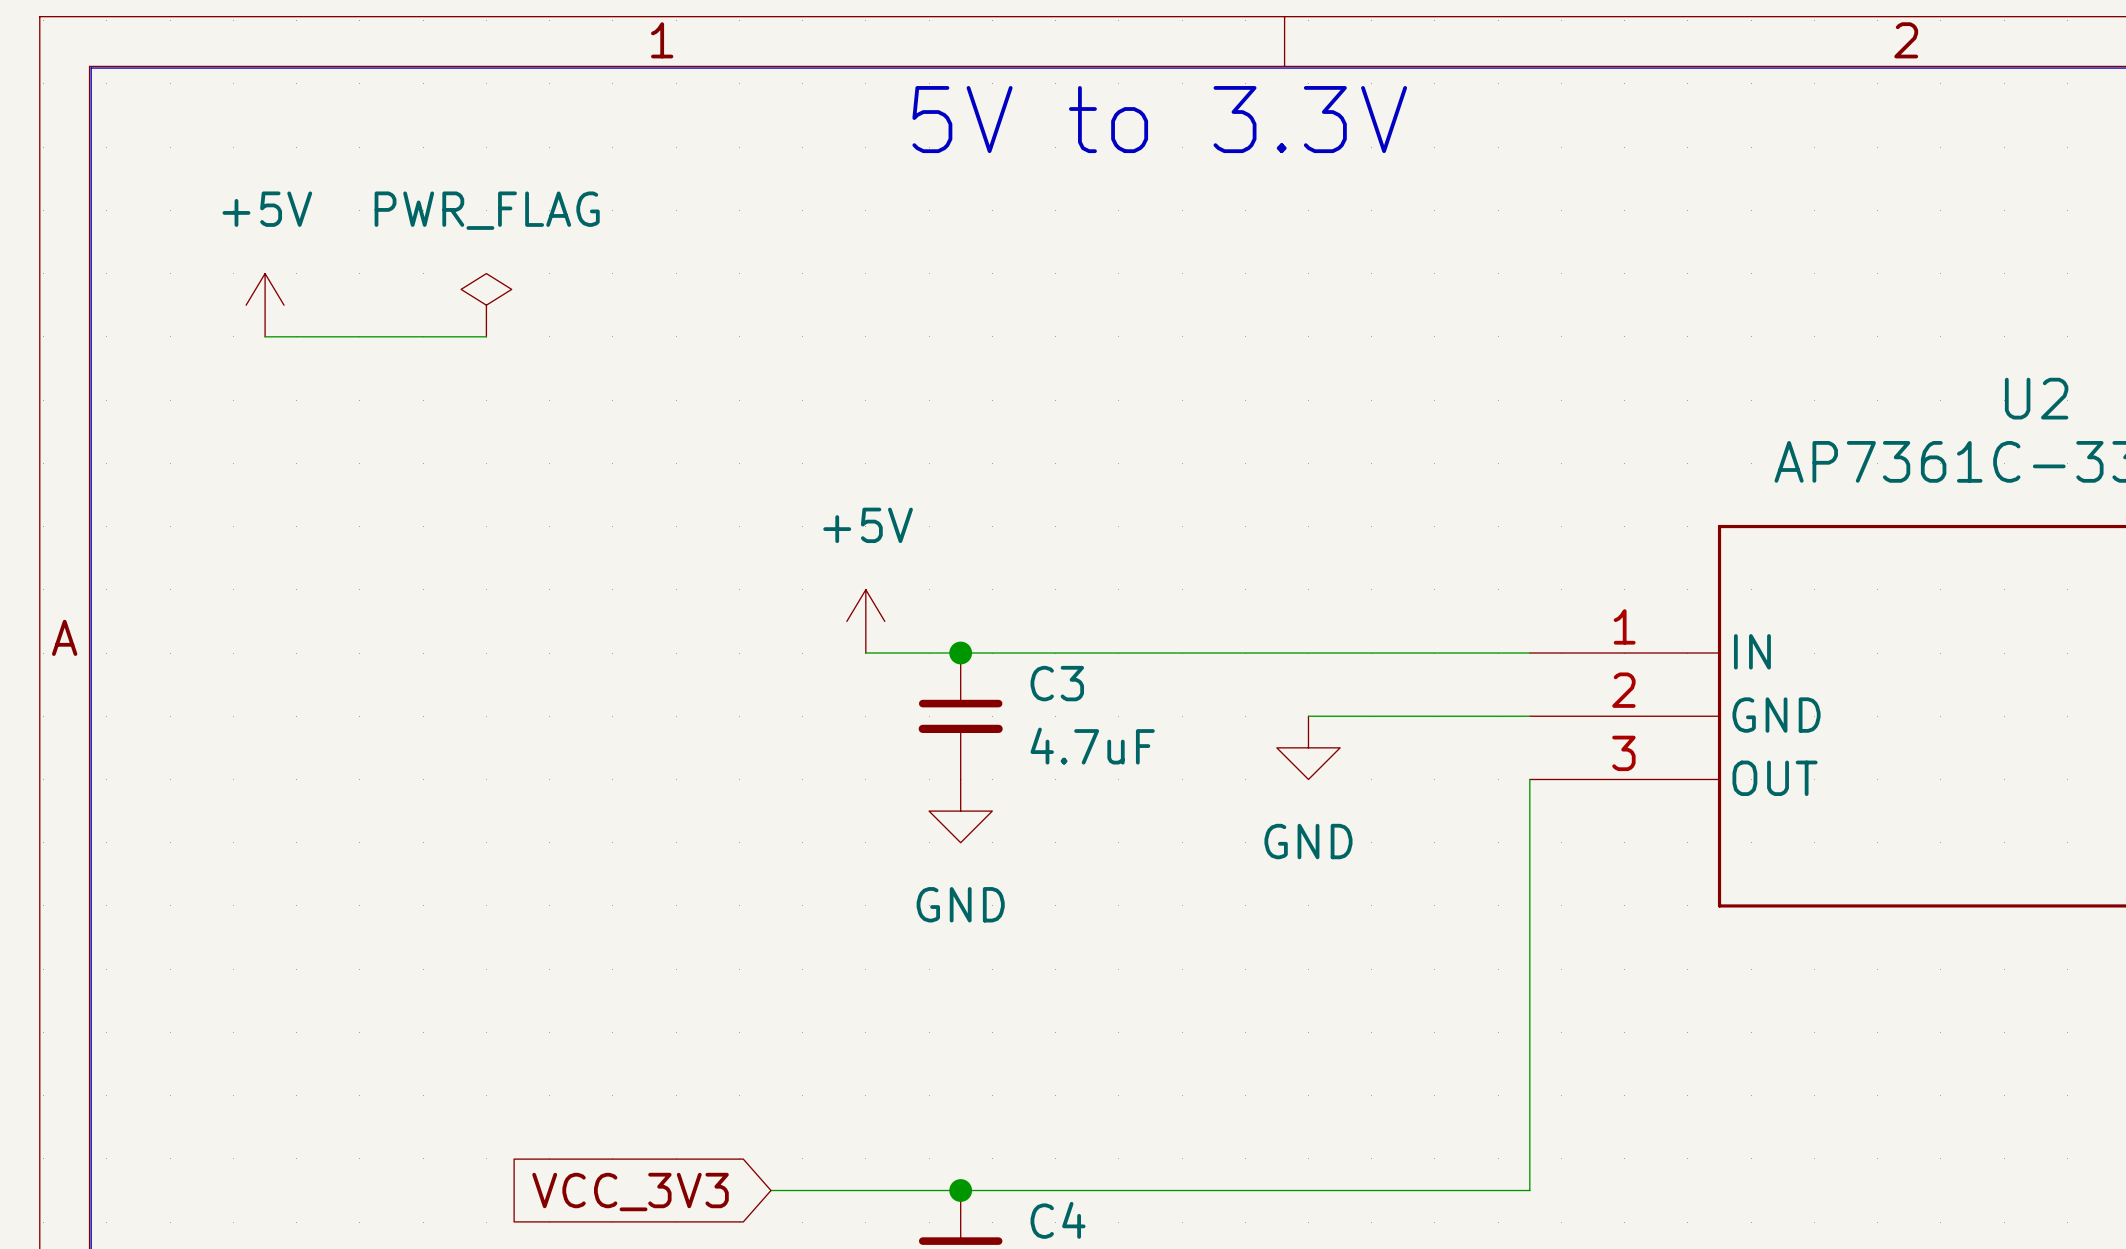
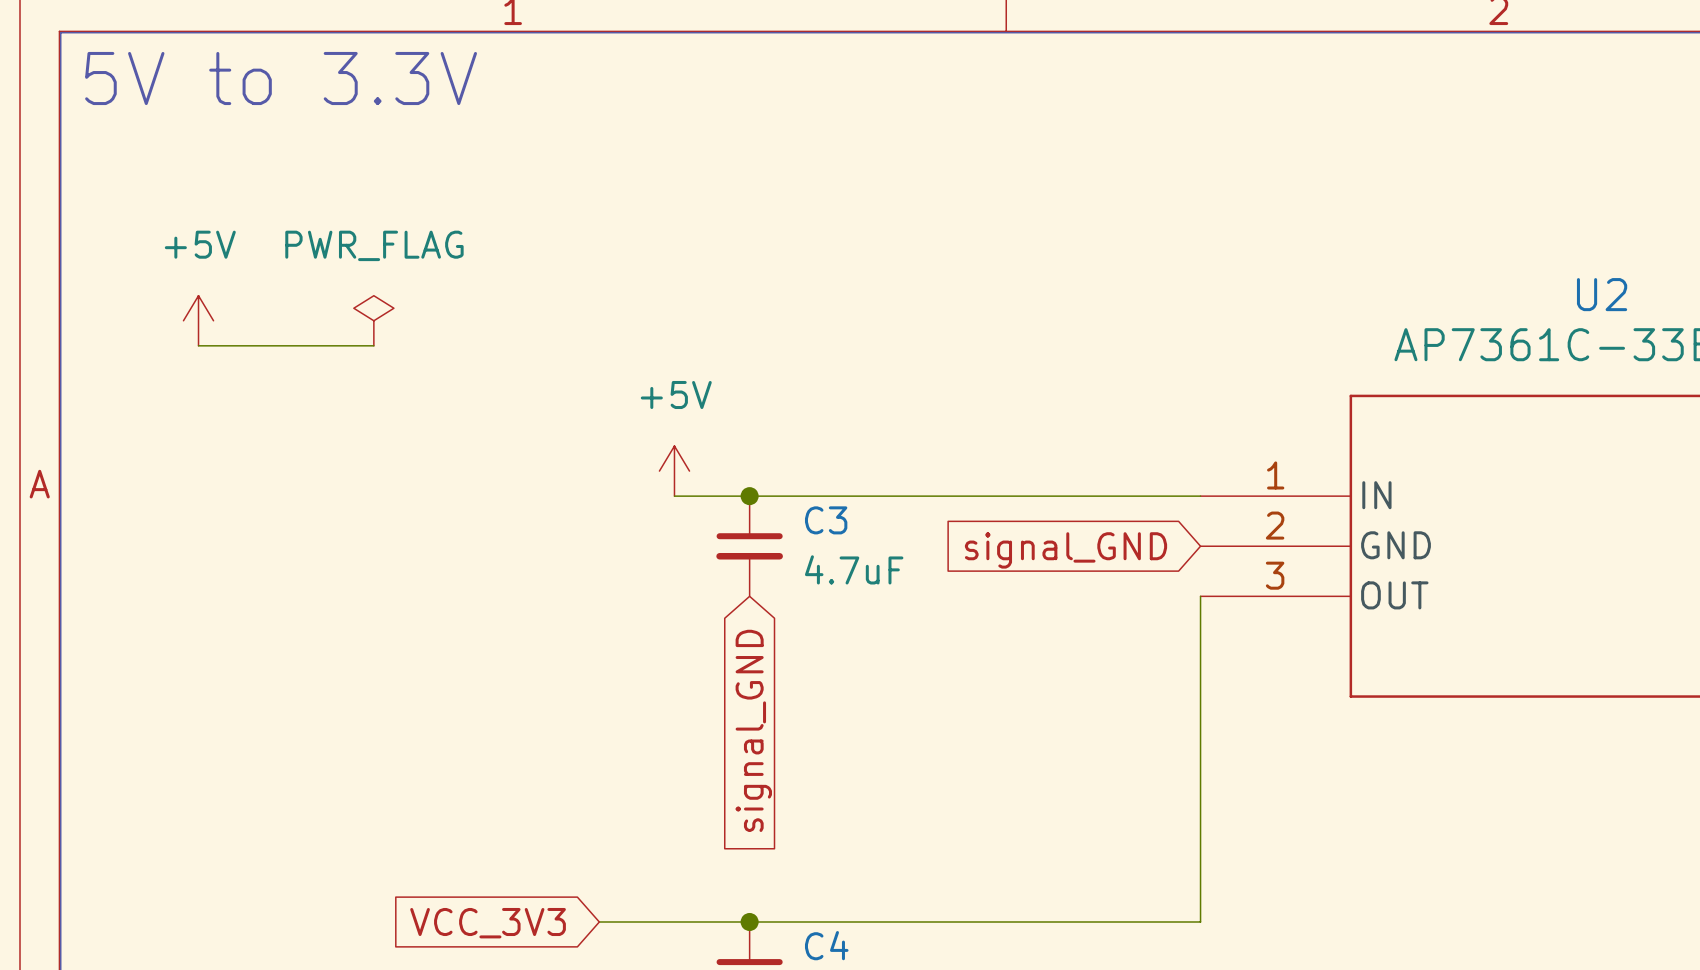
text: 5V to 3.3V (1159, 119) -> none
text: none -> 5V to 3.3V (281, 78)
power symbol position: +5V (265, 305) -> +5V (198, 320)
power symbol position: PWR_FLAG (486, 305) -> PWR_FLAG (373, 320)
wire: (265, 336) (486, 336) -> (198, 345) (373, 345)
wire: (1308, 716) (1529, 716) -> none
global label: none -> signal_GND (1066, 550)
power symbol: GND (1308, 747) -> none
power symbol: GND (960, 811) -> none
global label: none -> signal_GND (753, 730)

